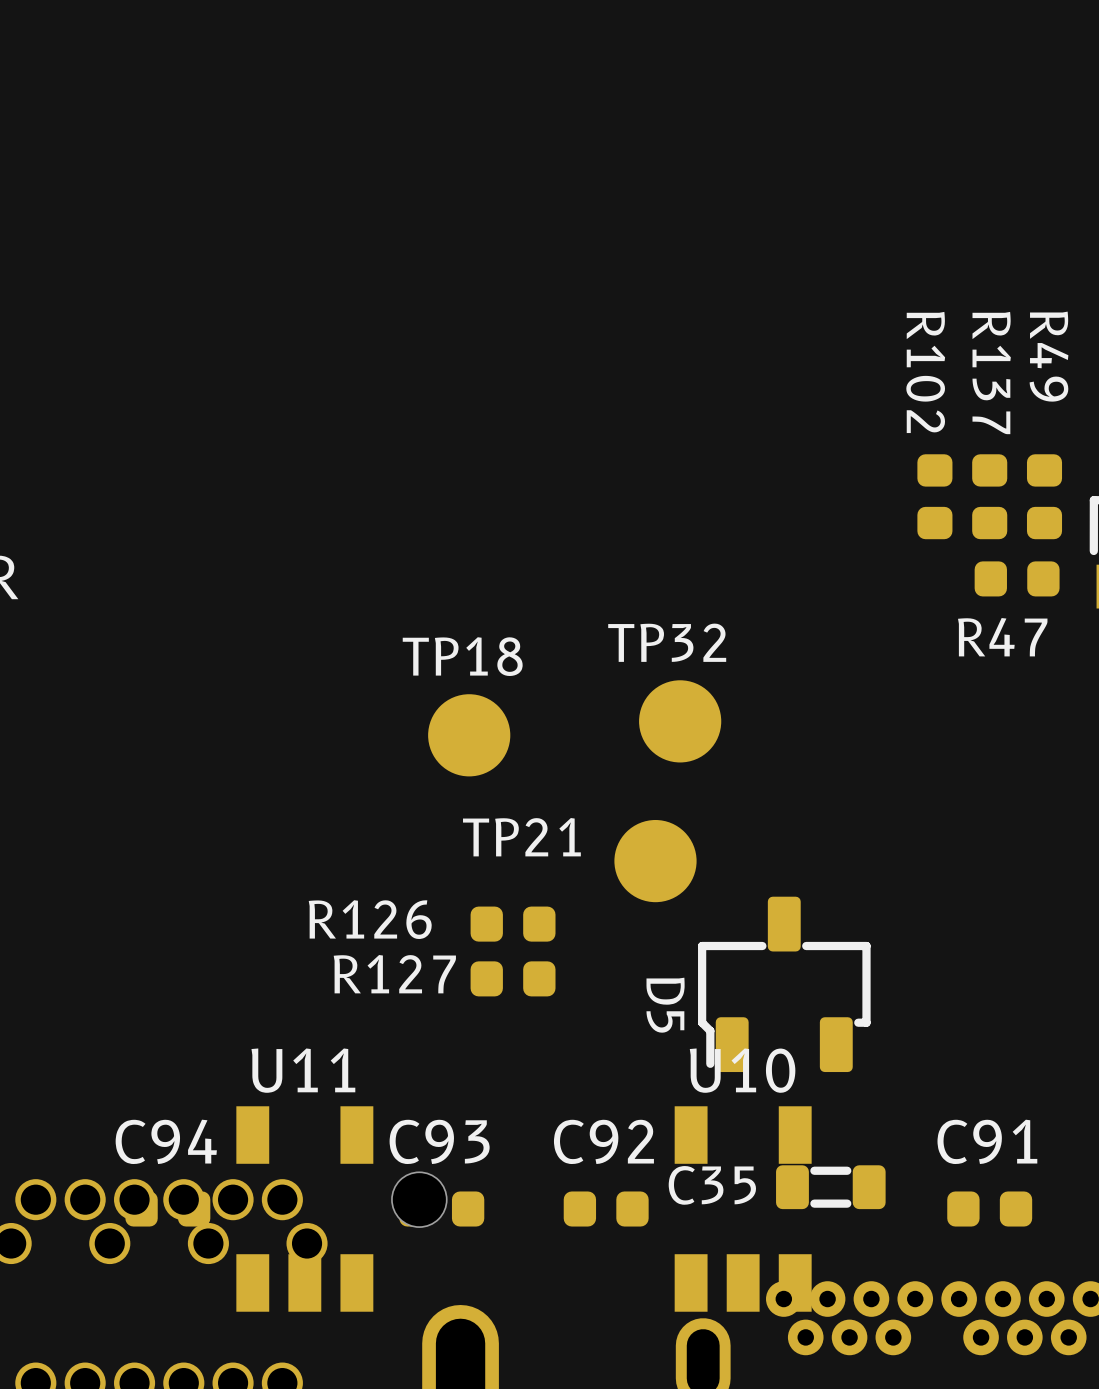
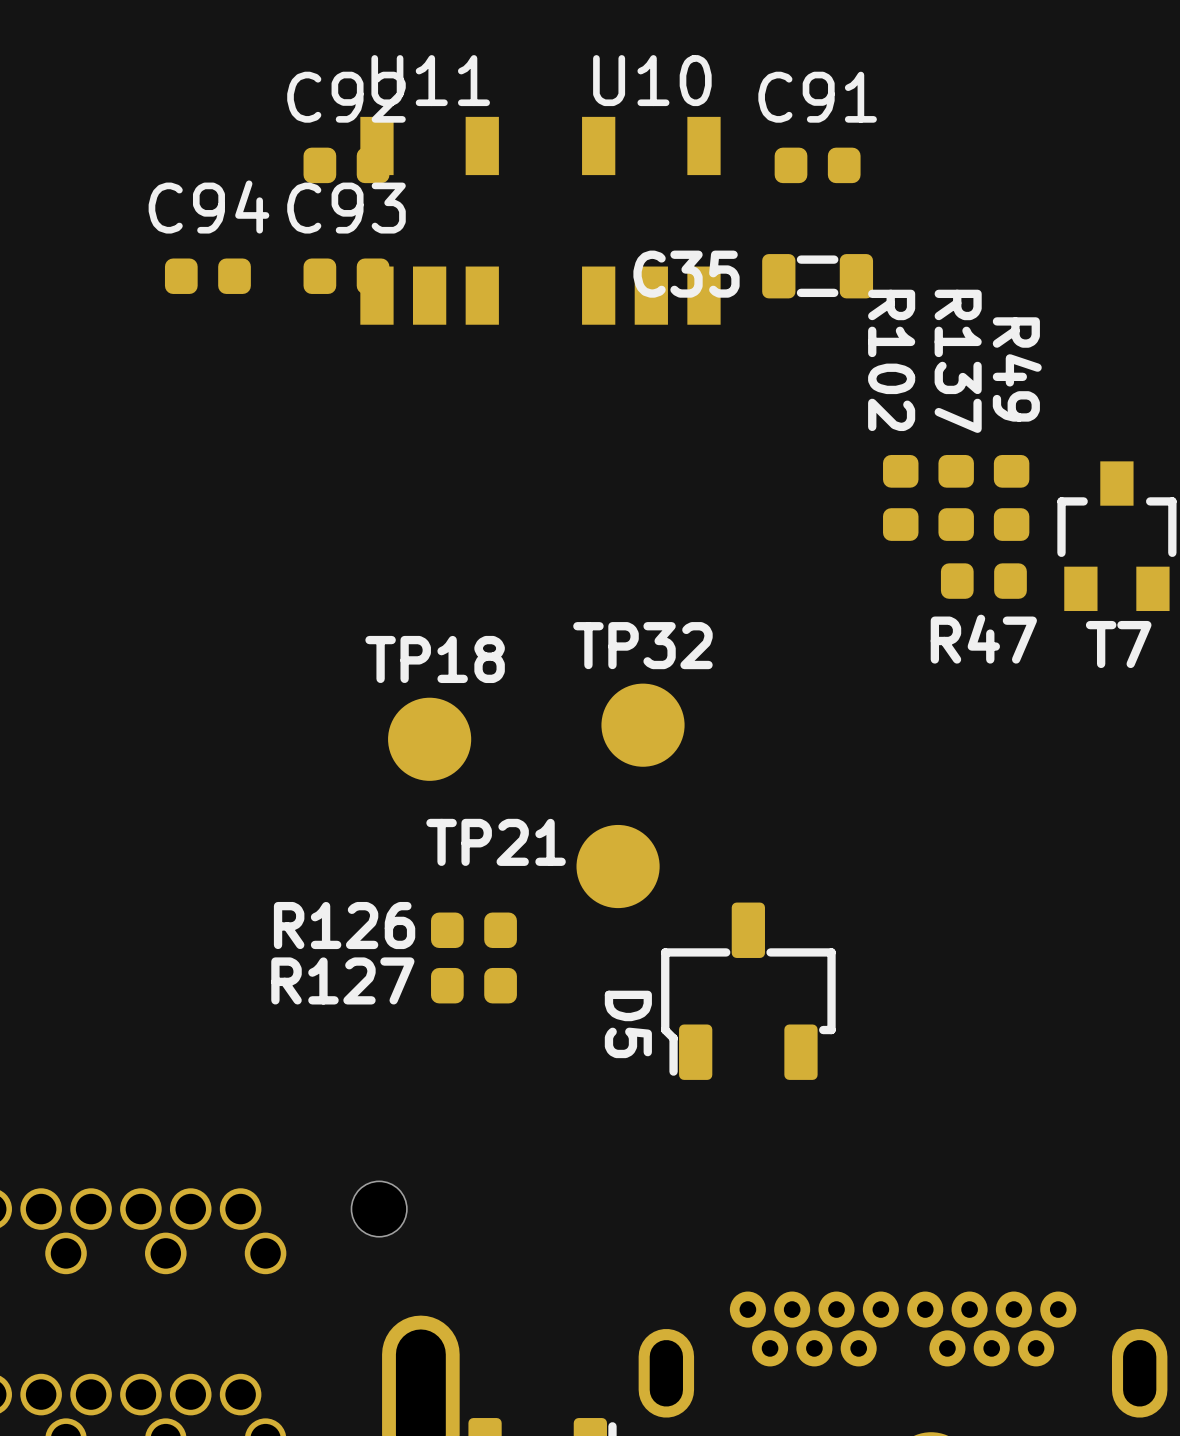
C35 position: (830, 1187) -> (817, 276)
C94 position: (167, 1209) -> (207, 276)
U11 position: (304, 1209) -> (429, 220)
C93 position: (441, 1209) -> (346, 276)
C92 position: (606, 1209) -> (346, 165)
U10 position: (743, 1209) -> (651, 220)
C91 position: (989, 1209) -> (817, 165)

